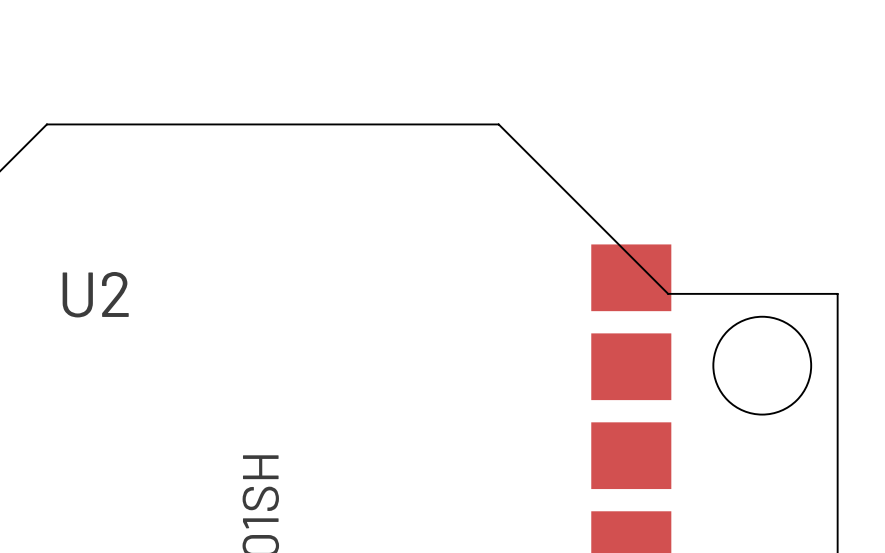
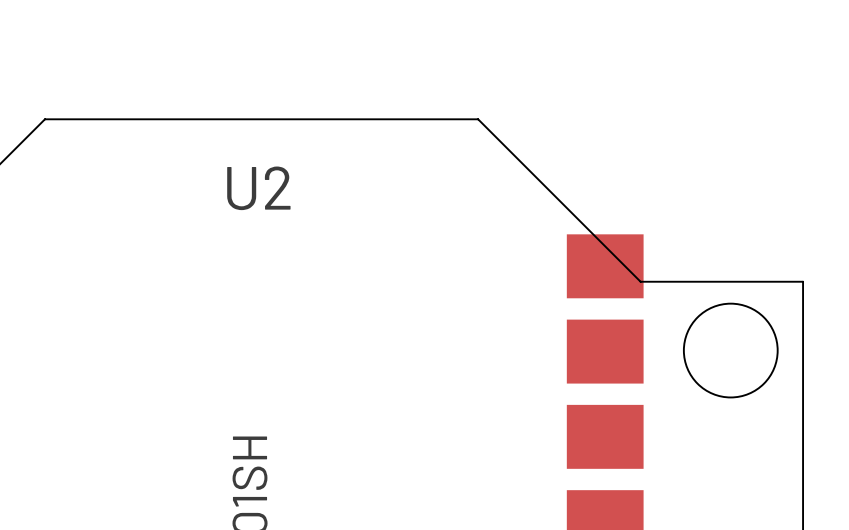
U2 name position: U2 (95, 294) -> U2 (258, 188)

